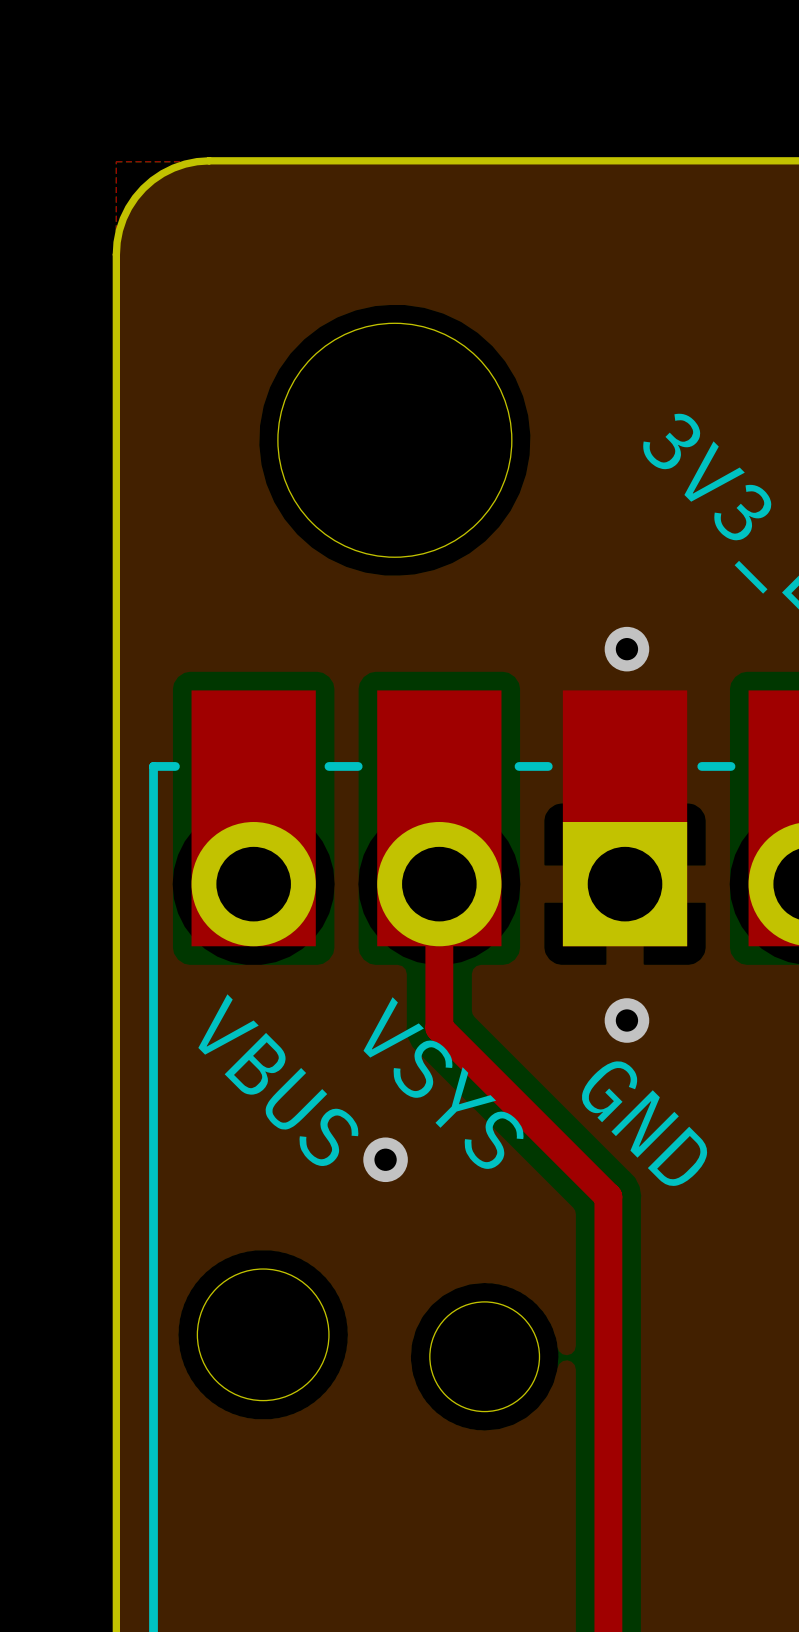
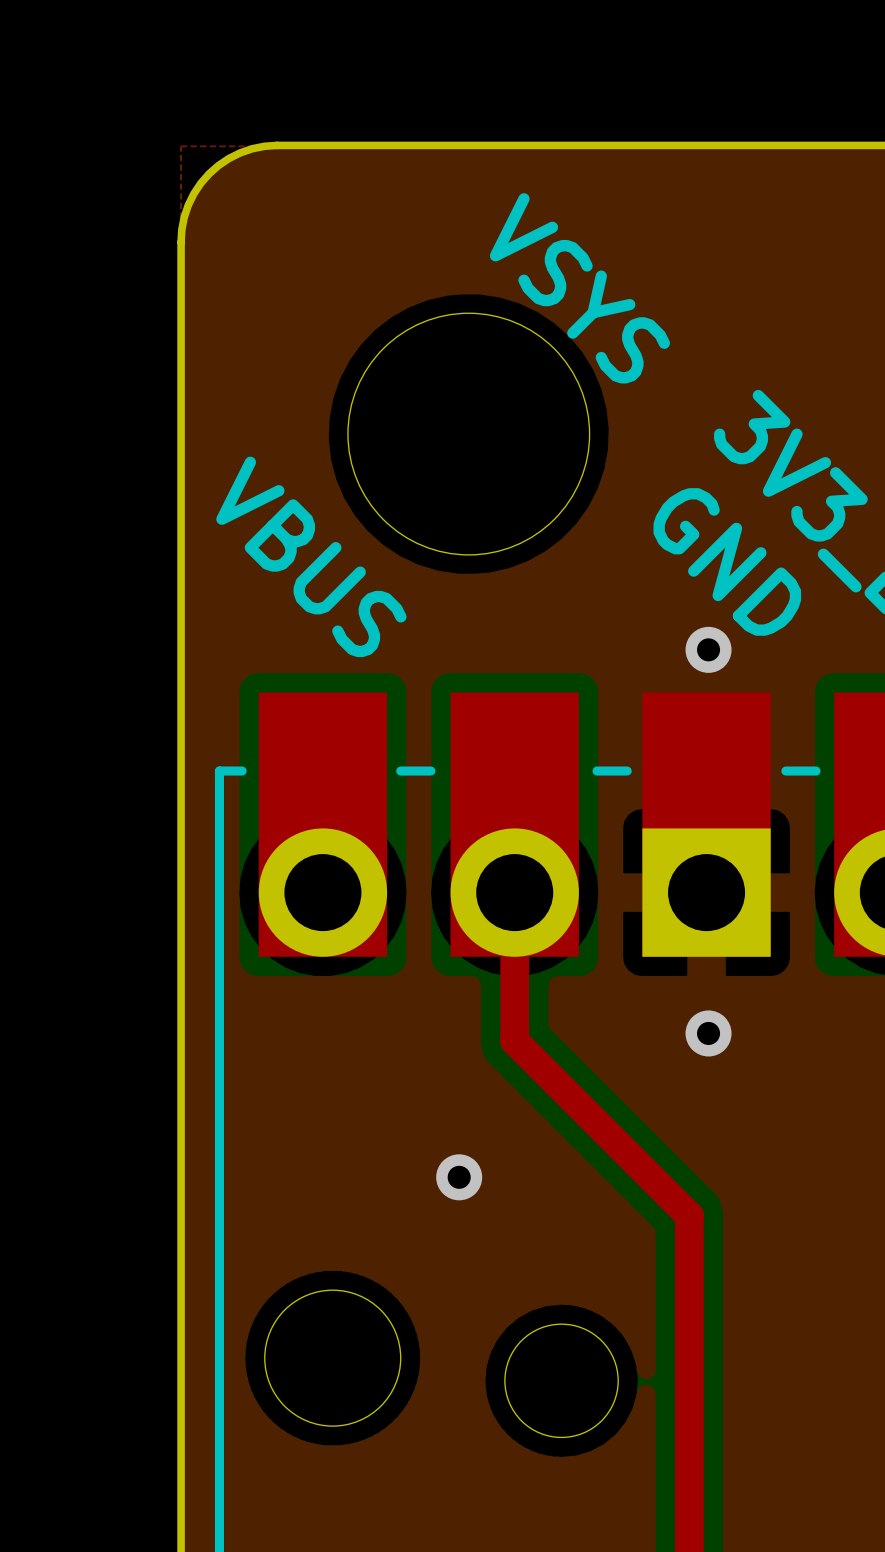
part text position: VBUS (278, 1080) -> VBUS (311, 556)
part text position: VSYS (443, 1083) -> VSYS (579, 288)
part text position: GND (644, 1123) -> GND (727, 561)

